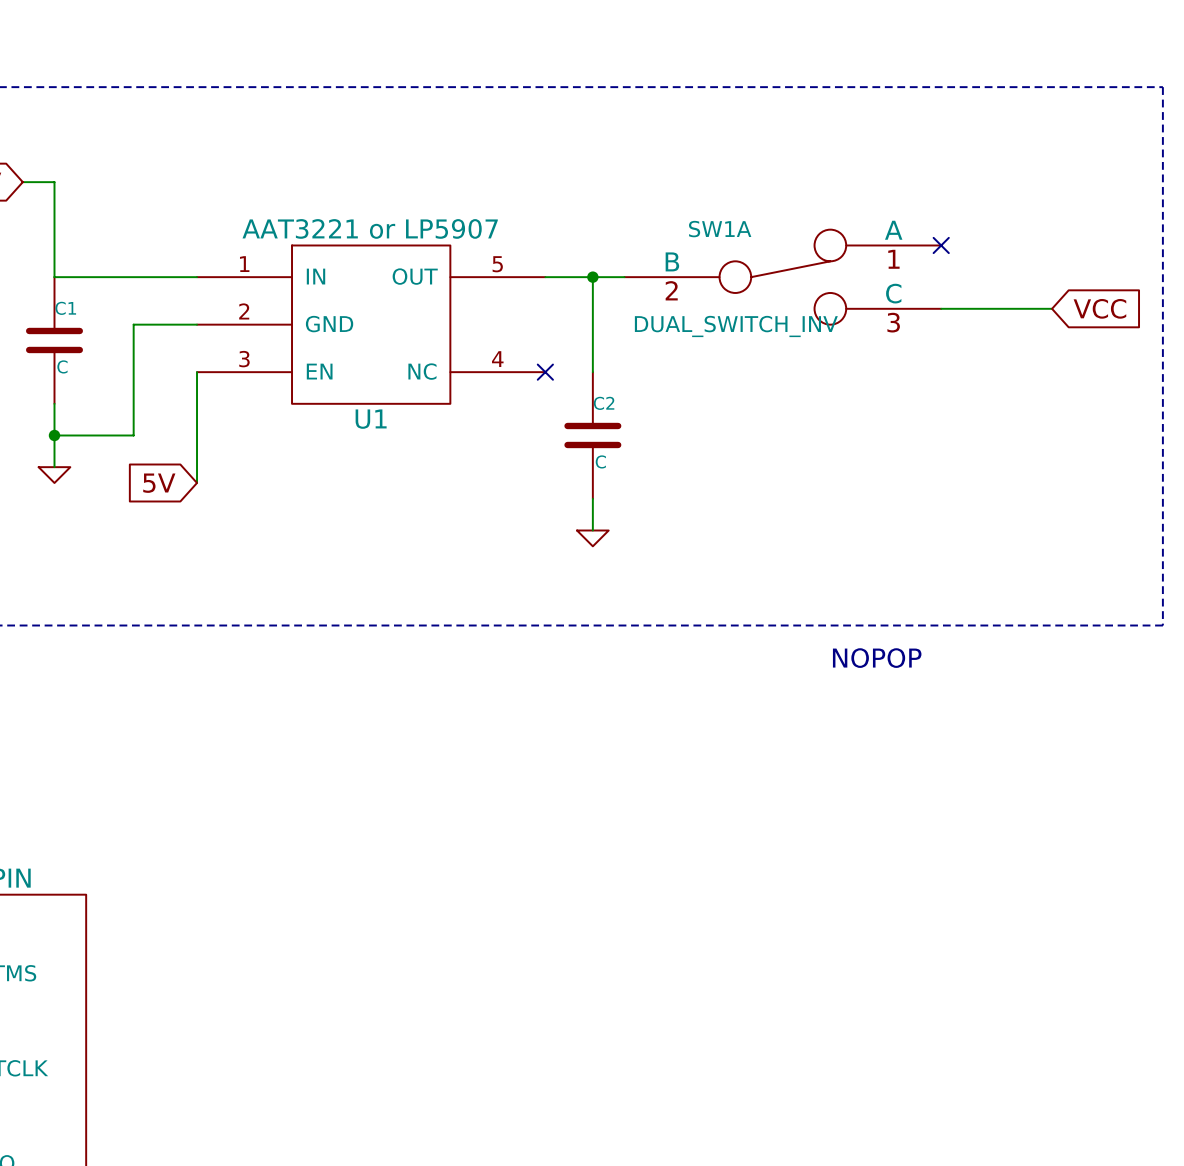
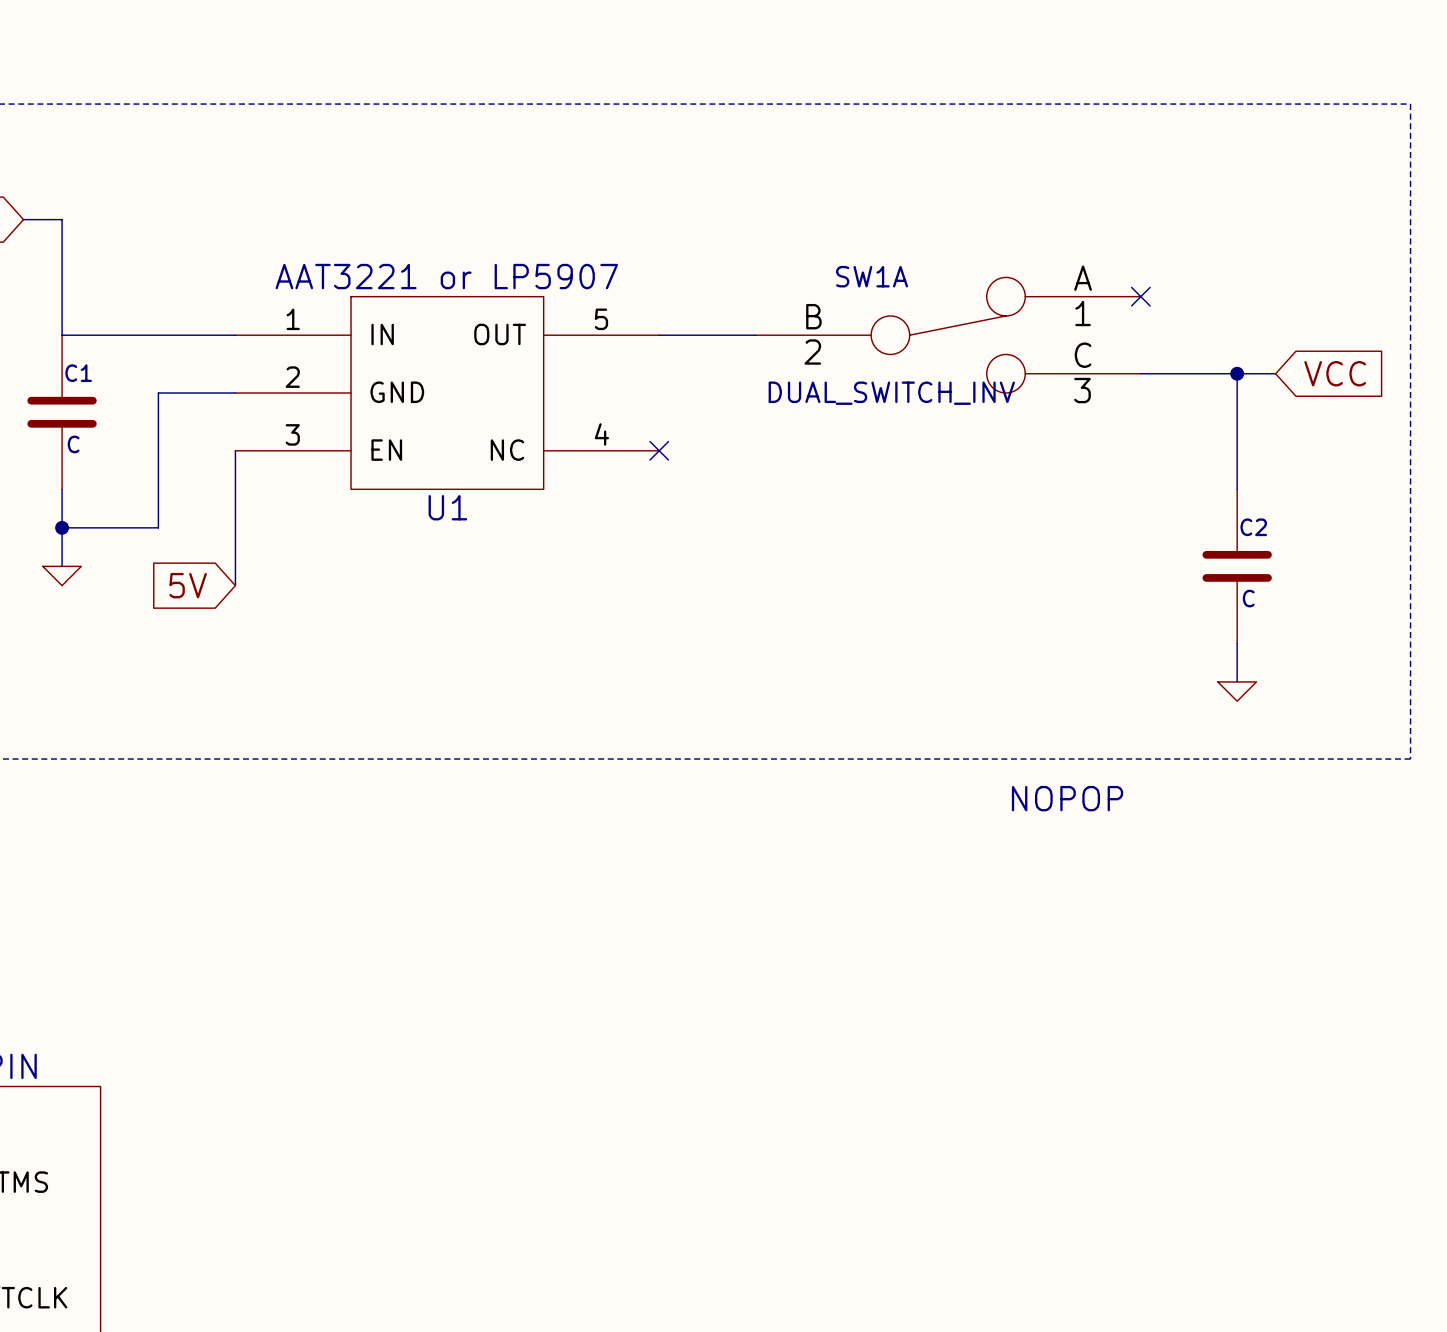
wire: (592, 277) (592, 372) -> none
junction: (592, 277) -> none
wire: none -> (1237, 373) (1237, 489)
junction: none -> (1237, 373)
C2 position: (592, 435) -> (1237, 566)
wire: (592, 498) (592, 530) -> none
wire: none -> (1237, 643) (1237, 681)
power symbol: (592, 538) -> none
power symbol: none -> (1237, 691)

